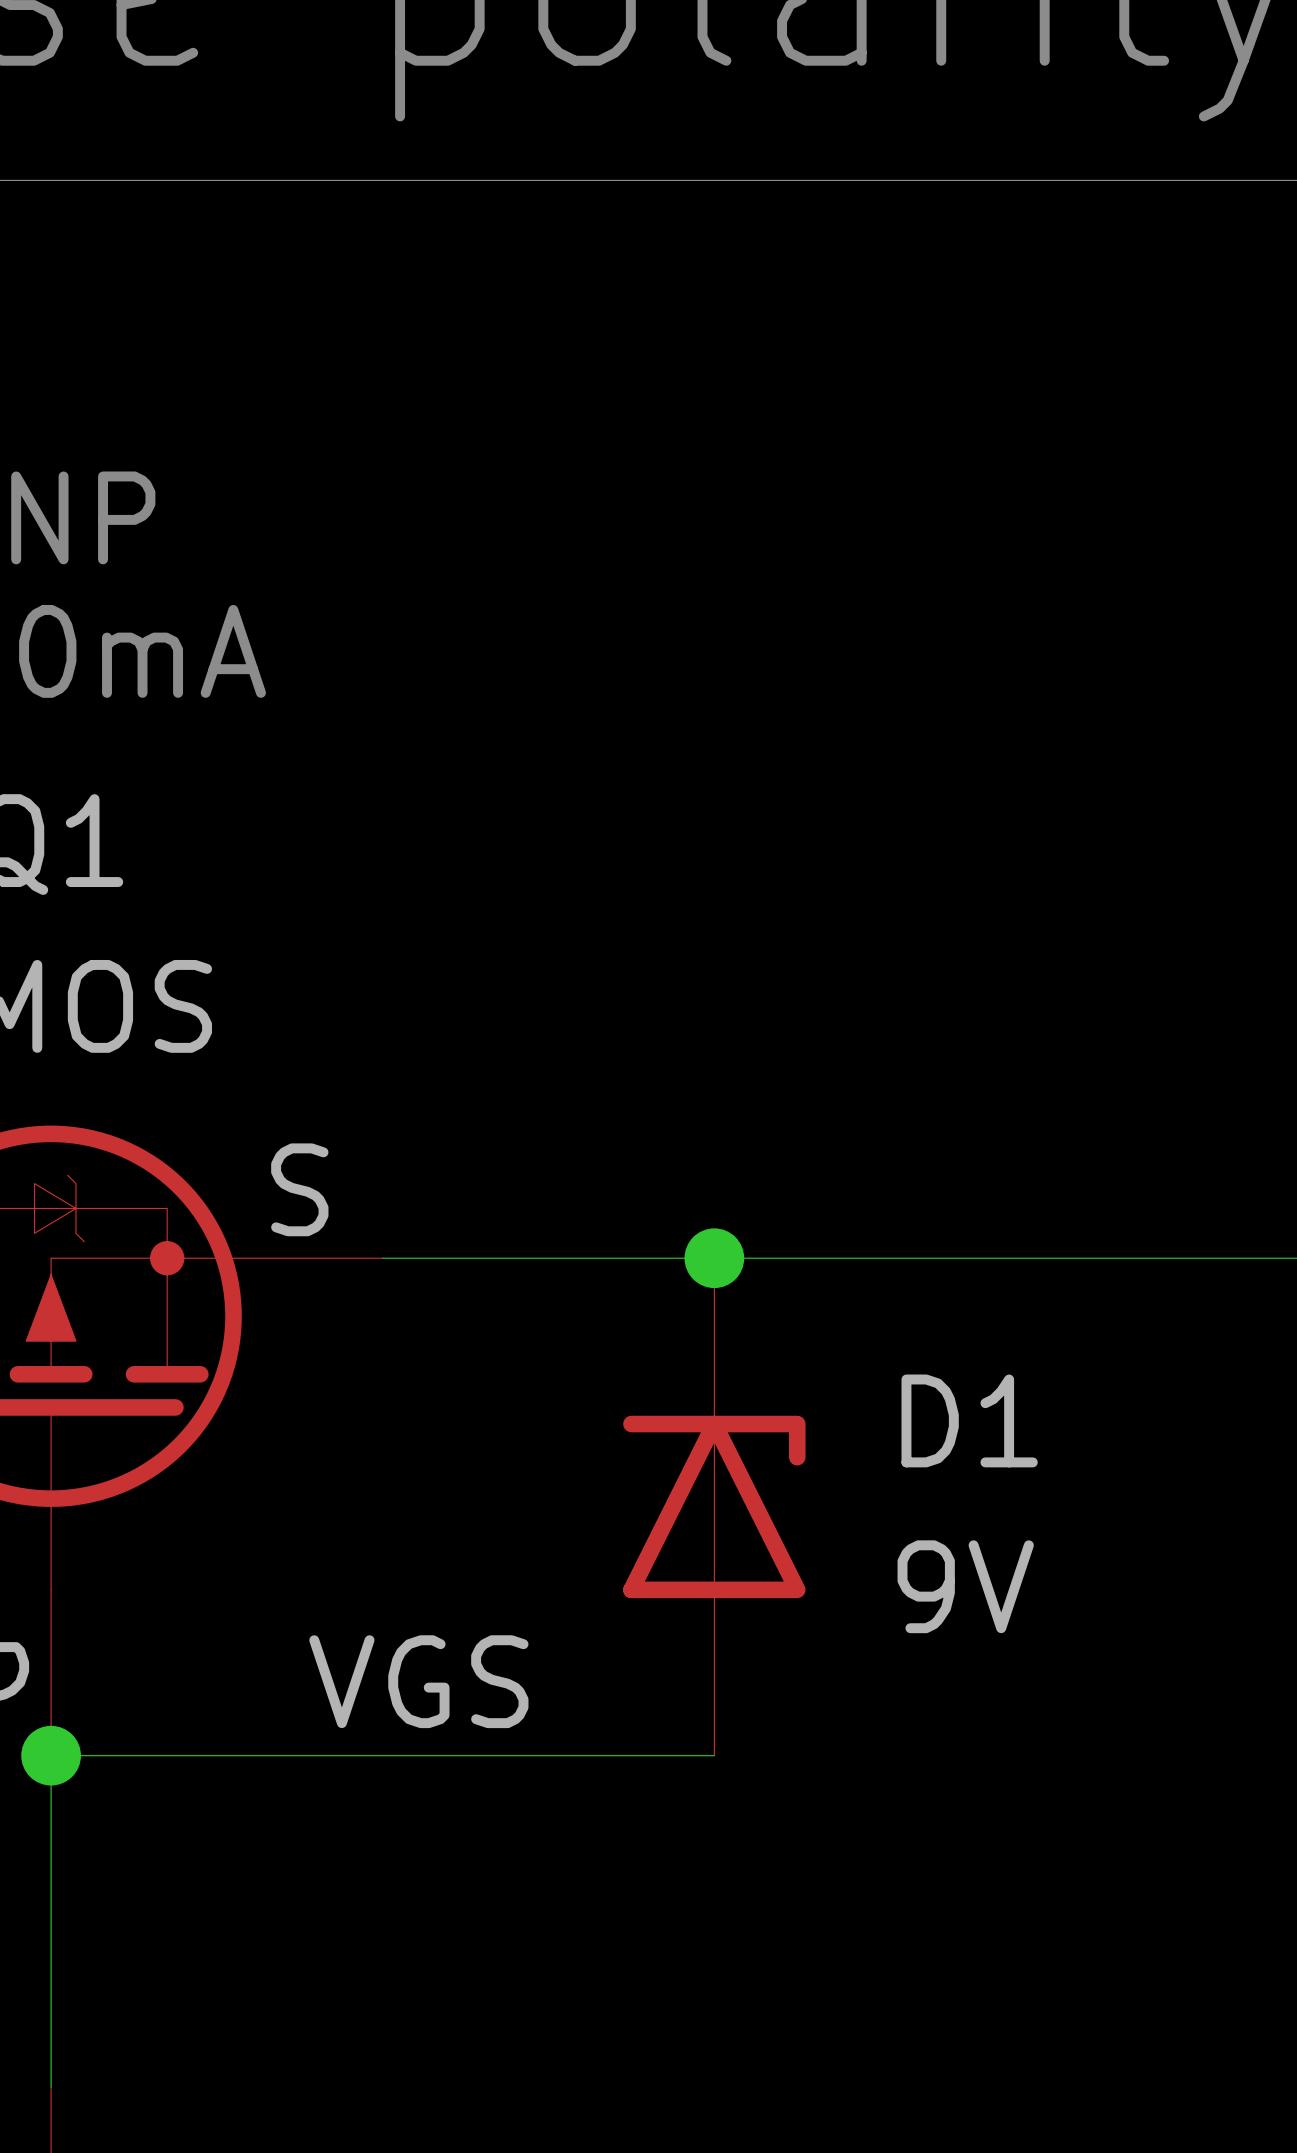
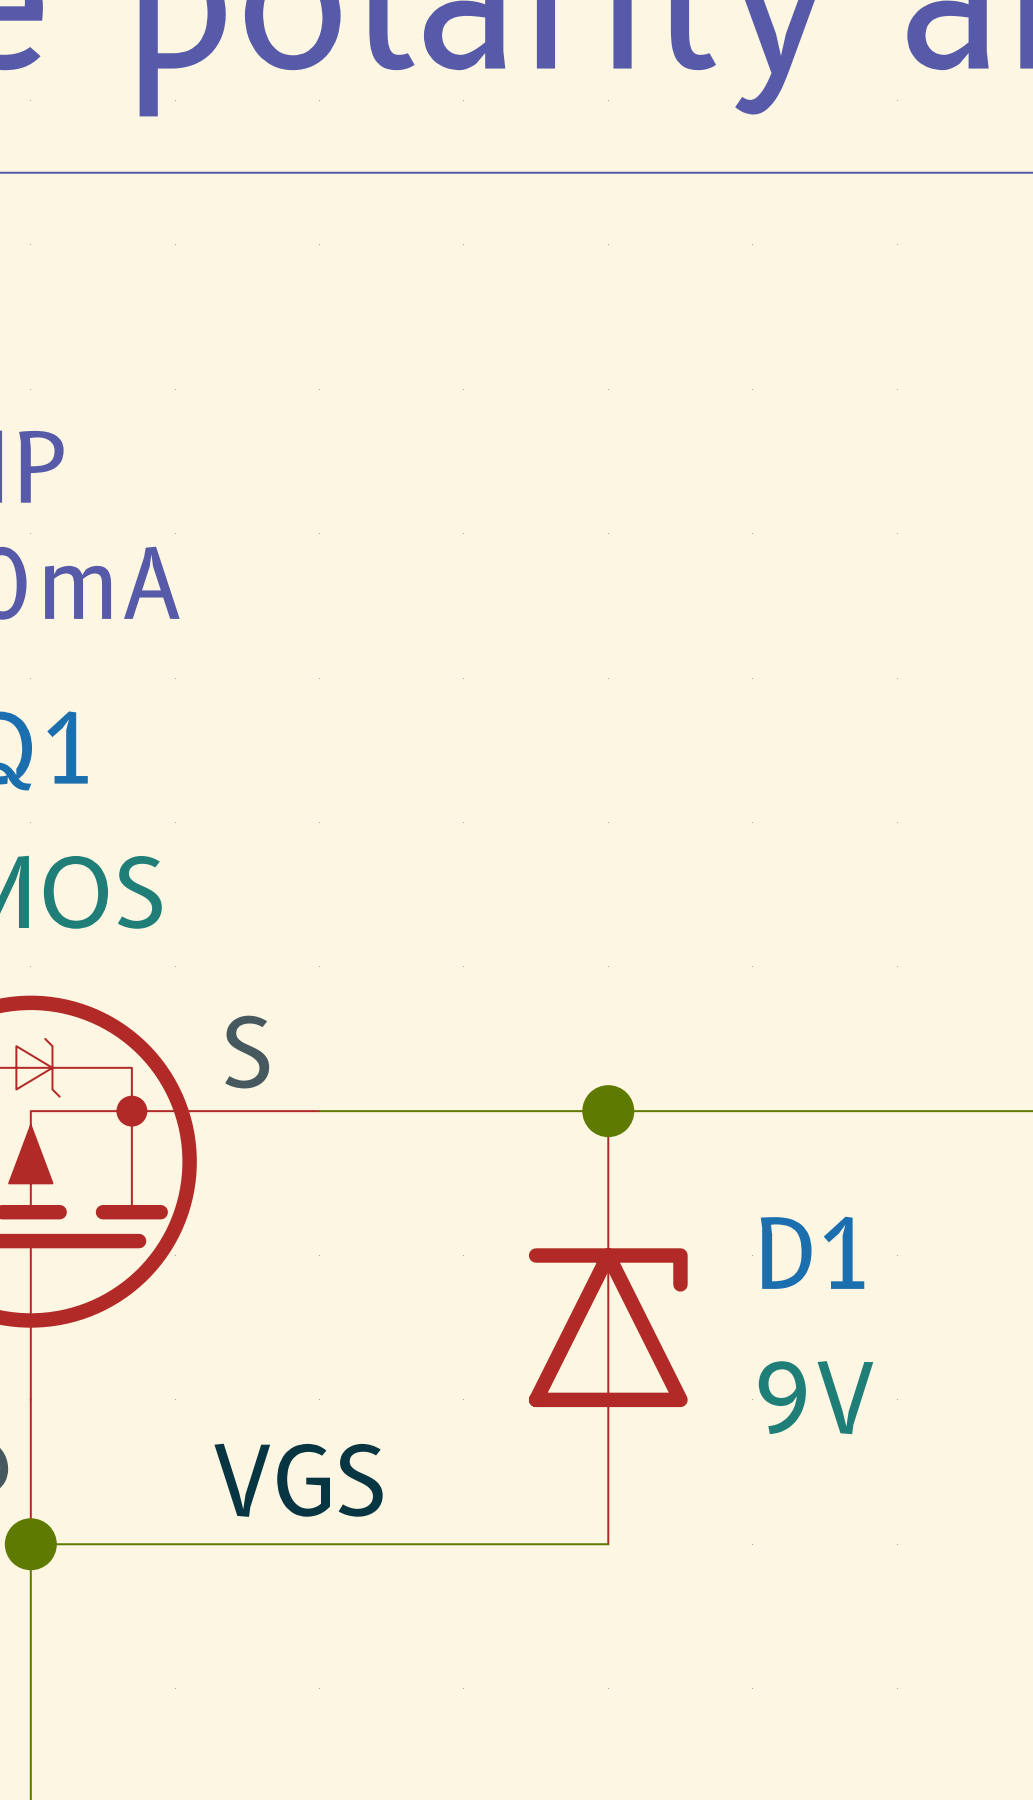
label position: VGS (418, 1681) -> VGS (298, 1480)

